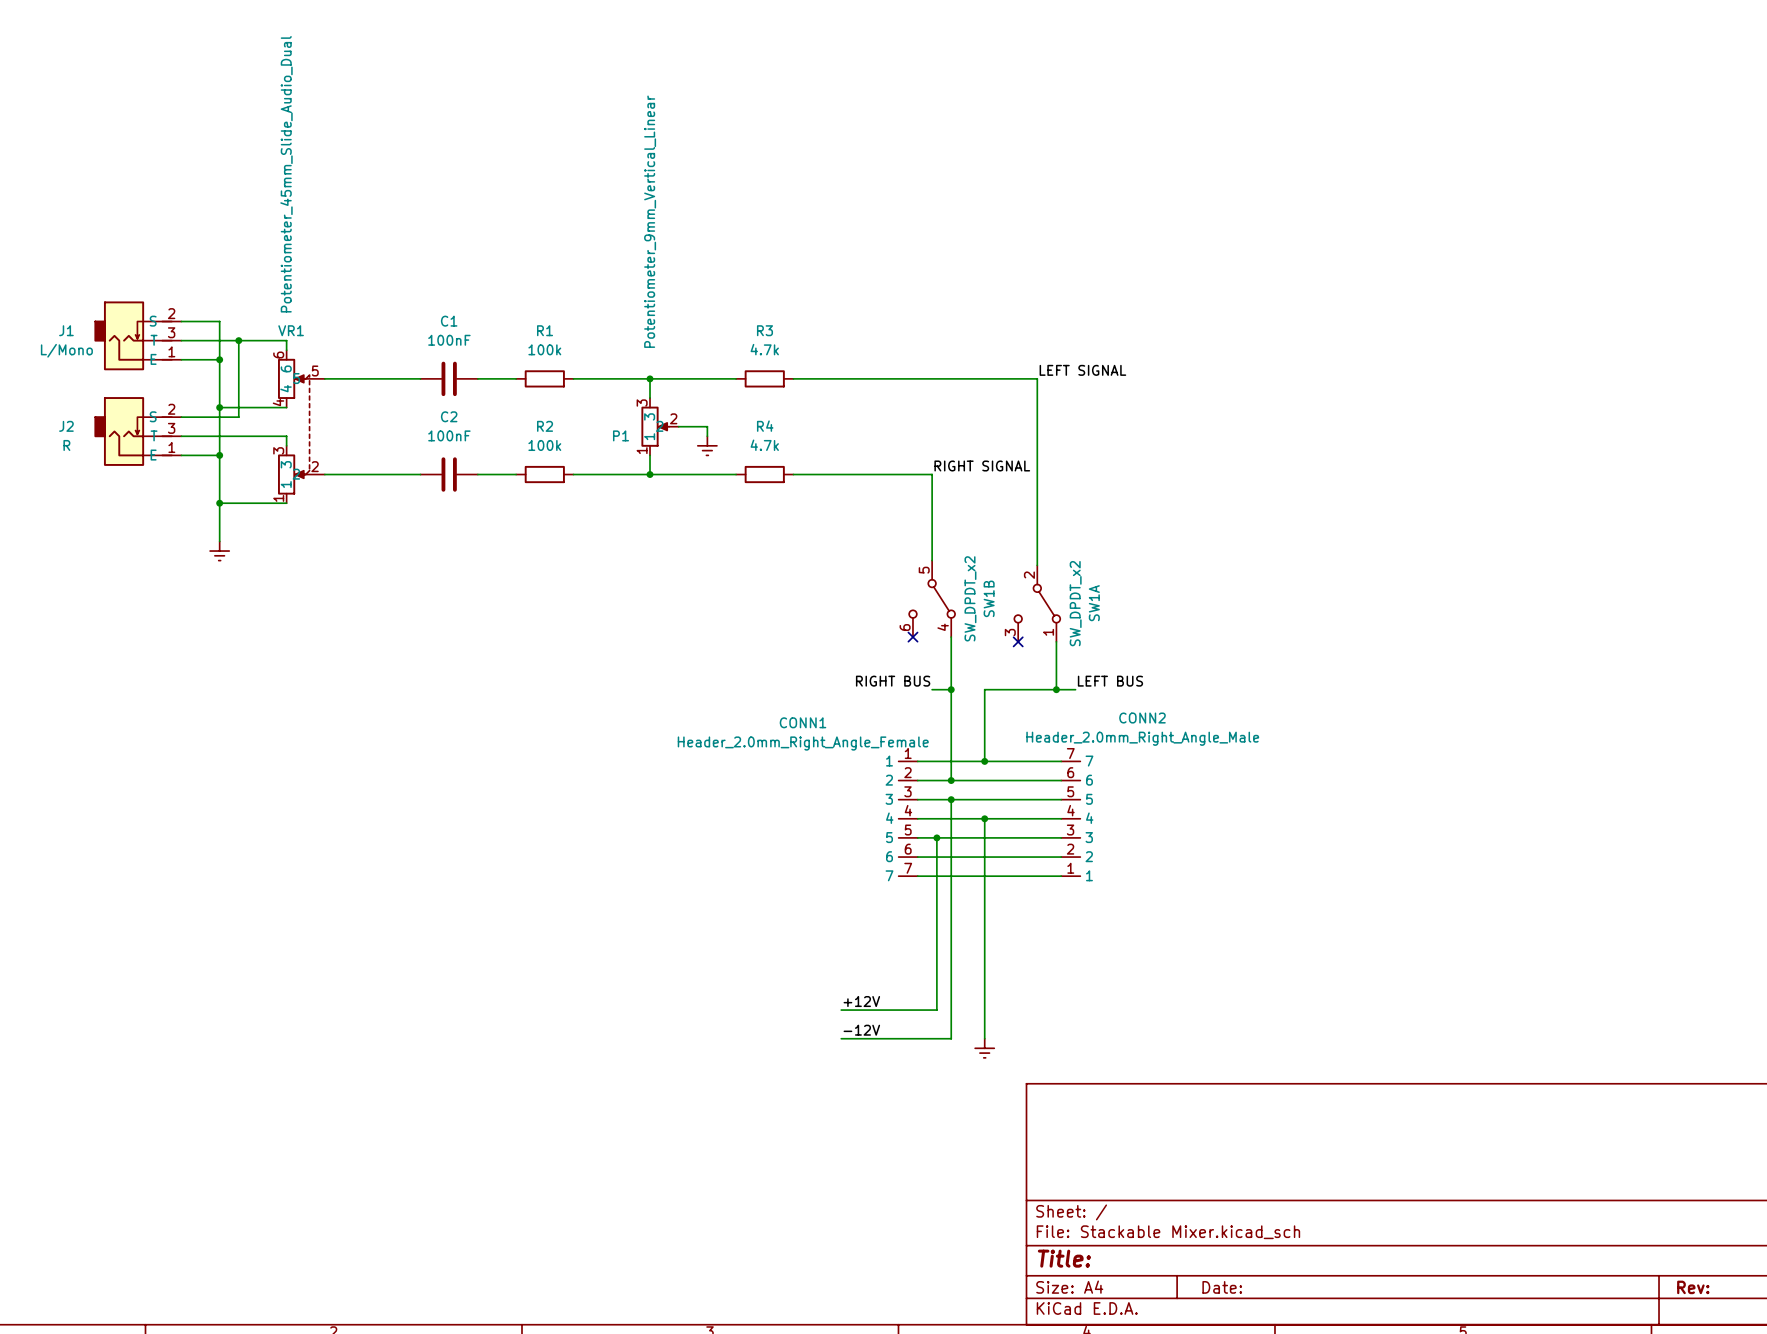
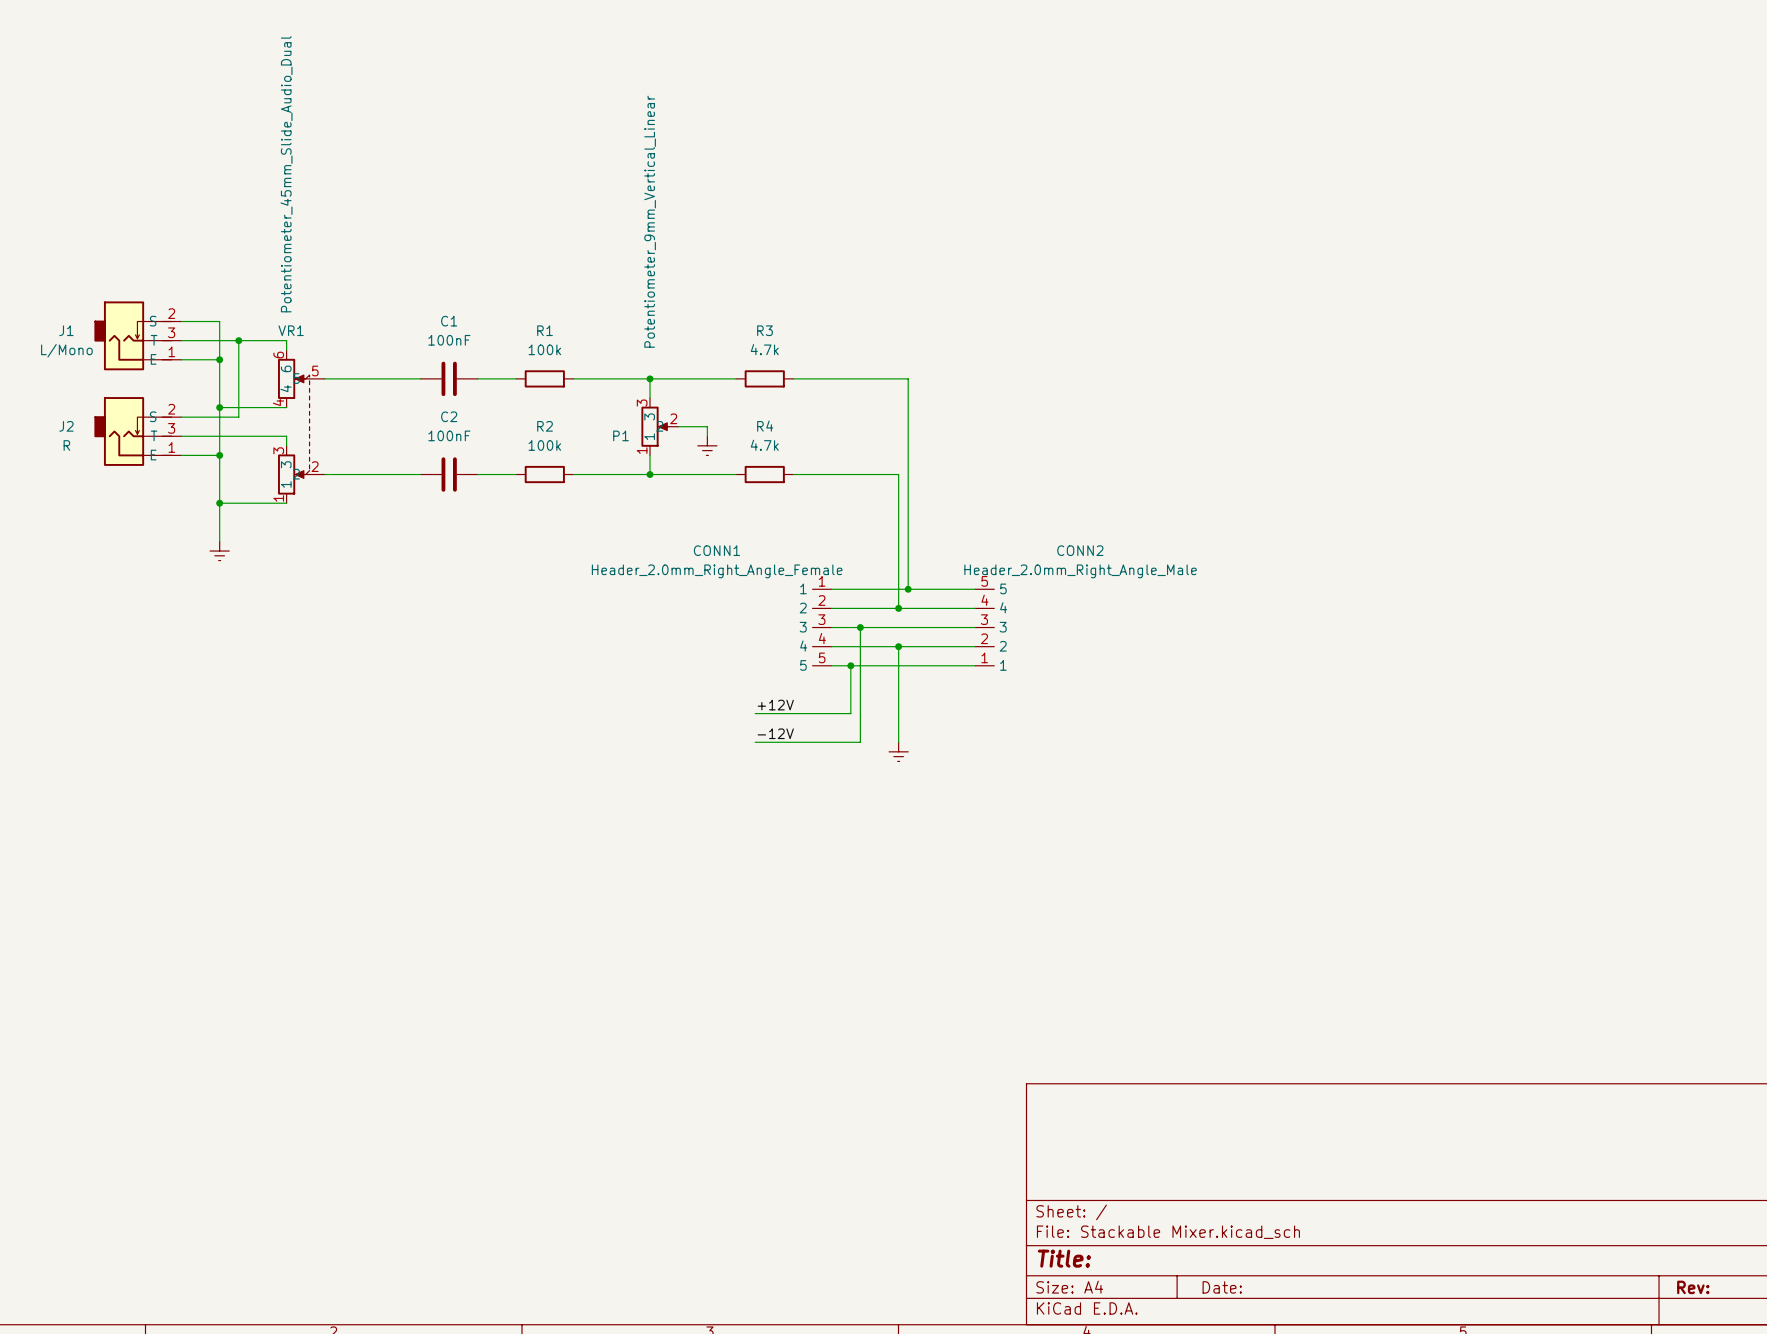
label: LEFT SIGNAL (1082, 370) -> none
wire: (908, 378) (1037, 378) (1037, 565) -> (908, 378) (908, 589)
label: RIGHT SIGNAL (982, 465) -> none
wire: (898, 474) (932, 474) (932, 560) -> (898, 474) (898, 608)
wire: none -> (831, 589) (975, 589)
junction: none -> (908, 589)
SW1B: SW_DPDT_x2 (932, 598) -> none
SW1A: SW_DPDT_x2 (1037, 603) -> none
junction: none -> (898, 608)
wire: none -> (860, 627) (860, 742) (755, 742)
junction: none -> (860, 627)
no-connect mark: (912, 637) -> none
wire: (951, 637) (951, 780) -> none
no-connect mark: (1018, 641) -> none
wire: (1056, 641) (1056, 689) -> none
wire: none -> (898, 646) (898, 742)
junction: none -> (898, 646)
wire: none -> (850, 665) (850, 713) (755, 713)
junction: none -> (850, 665)
label: RIGHT BUS (893, 681) -> none
label: LEFT BUS (1110, 681) -> none
wire: (932, 689) (951, 689) -> none
junction: (951, 689) -> none
junction: (1056, 689) -> none
wire: (1075, 689) (984, 689) (984, 761) -> none
label: none -> +12V (775, 705)
CONN2 name position: CONN2 (1142, 718) -> CONN2 (1080, 550)
CONN1 name position: CONN1 (803, 722) -> CONN1 (716, 550)
label: none -> -12V (775, 733)
CONN2 value position: Header_2.0mm_Right_Angle_Male (1142, 738) -> Header_2.0mm_Right_Angle_Male (1080, 571)
CONN1 value position: Header_2.0mm_Right_Angle_Female (803, 743) -> Header_2.0mm_Right_Angle_Female (717, 571)
power symbol: none -> (898, 751)
CONN1 symbol: [898, 761, 918, 877] -> [812, 589, 832, 666]
wire: (917, 761) (1061, 761) -> (831, 608) (975, 608)
junction: (984, 761) -> none
CONN2 symbol: [1061, 761, 1081, 877] -> [975, 589, 995, 666]
wire: (917, 780) (1061, 780) -> (831, 627) (975, 627)
junction: (951, 780) -> none
wire: (917, 799) (1061, 799) -> (831, 646) (975, 646)
wire: (951, 799) (951, 1038) (841, 1038) -> none
junction: (951, 799) -> none
wire: (917, 818) (1061, 818) -> (831, 665) (975, 665)
wire: (984, 818) (984, 1038) -> none
junction: (984, 818) -> none
wire: (917, 837) (1061, 837) -> none
wire: (936, 837) (936, 1010) (841, 1010) -> none
junction: (936, 837) -> none
wire: (917, 857) (1061, 857) -> none
wire: (917, 876) (1061, 876) -> none
label: +12V (861, 1001) -> none
label: -12V (861, 1030) -> none
power symbol: (984, 1048) -> none

